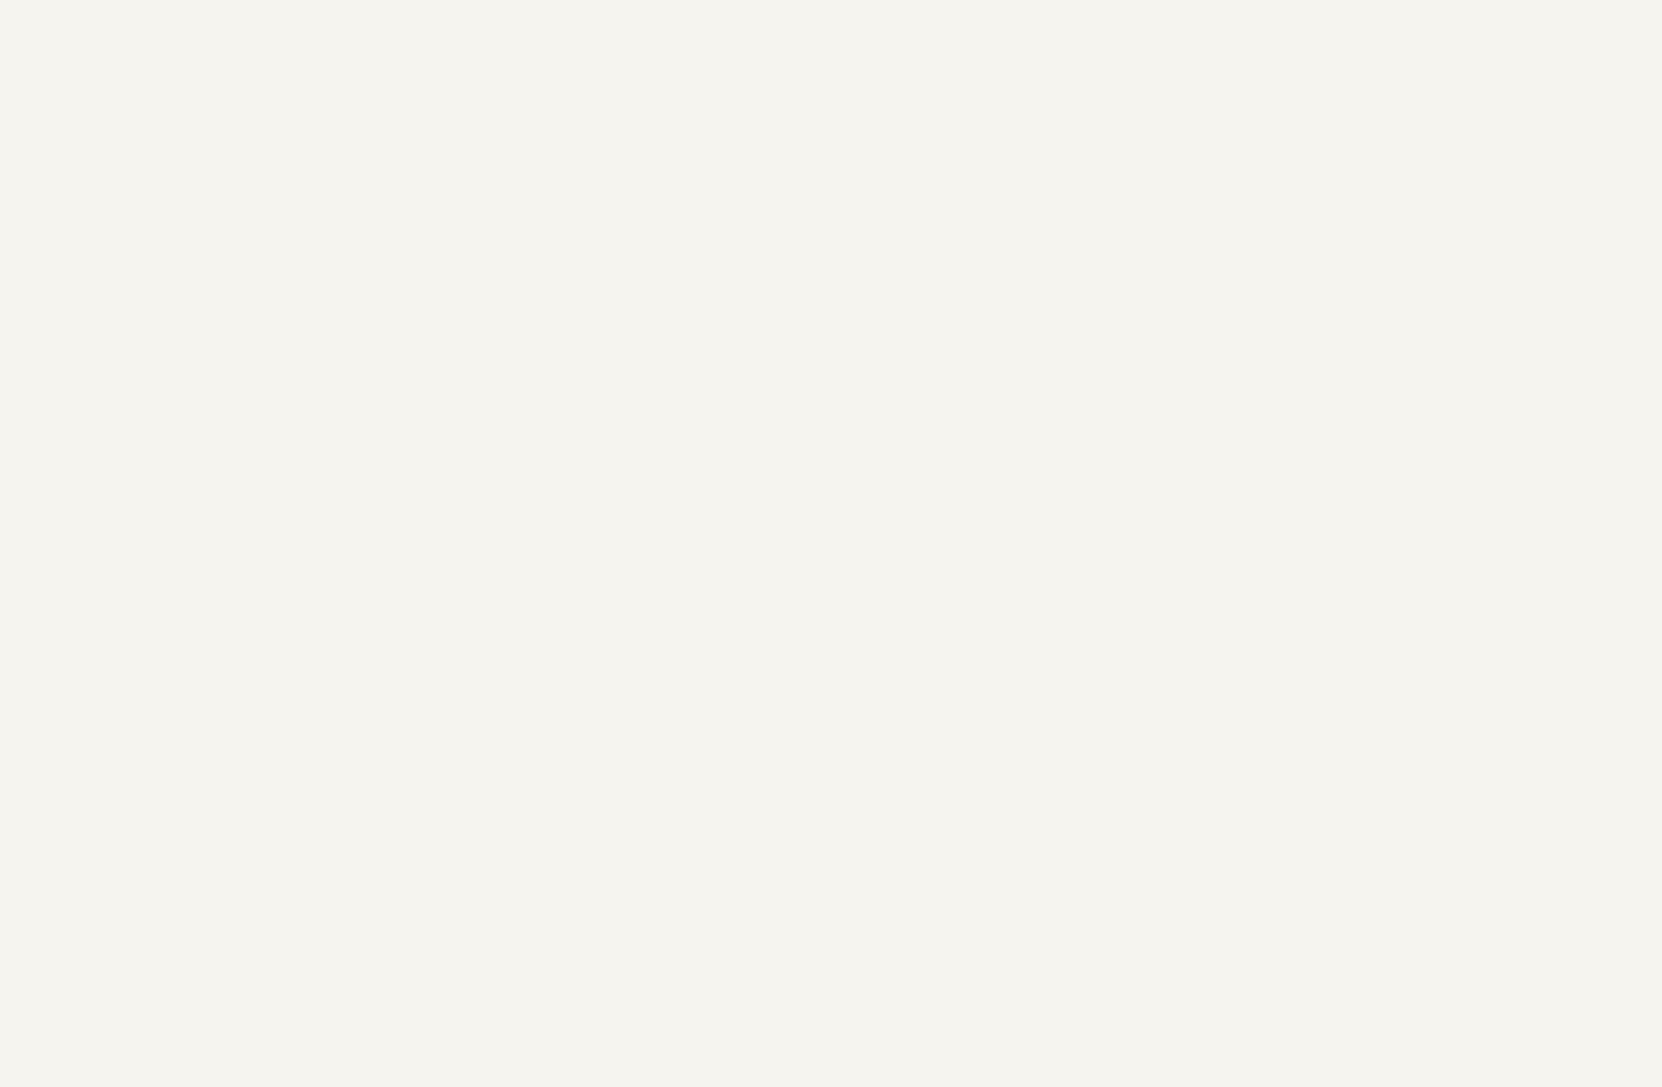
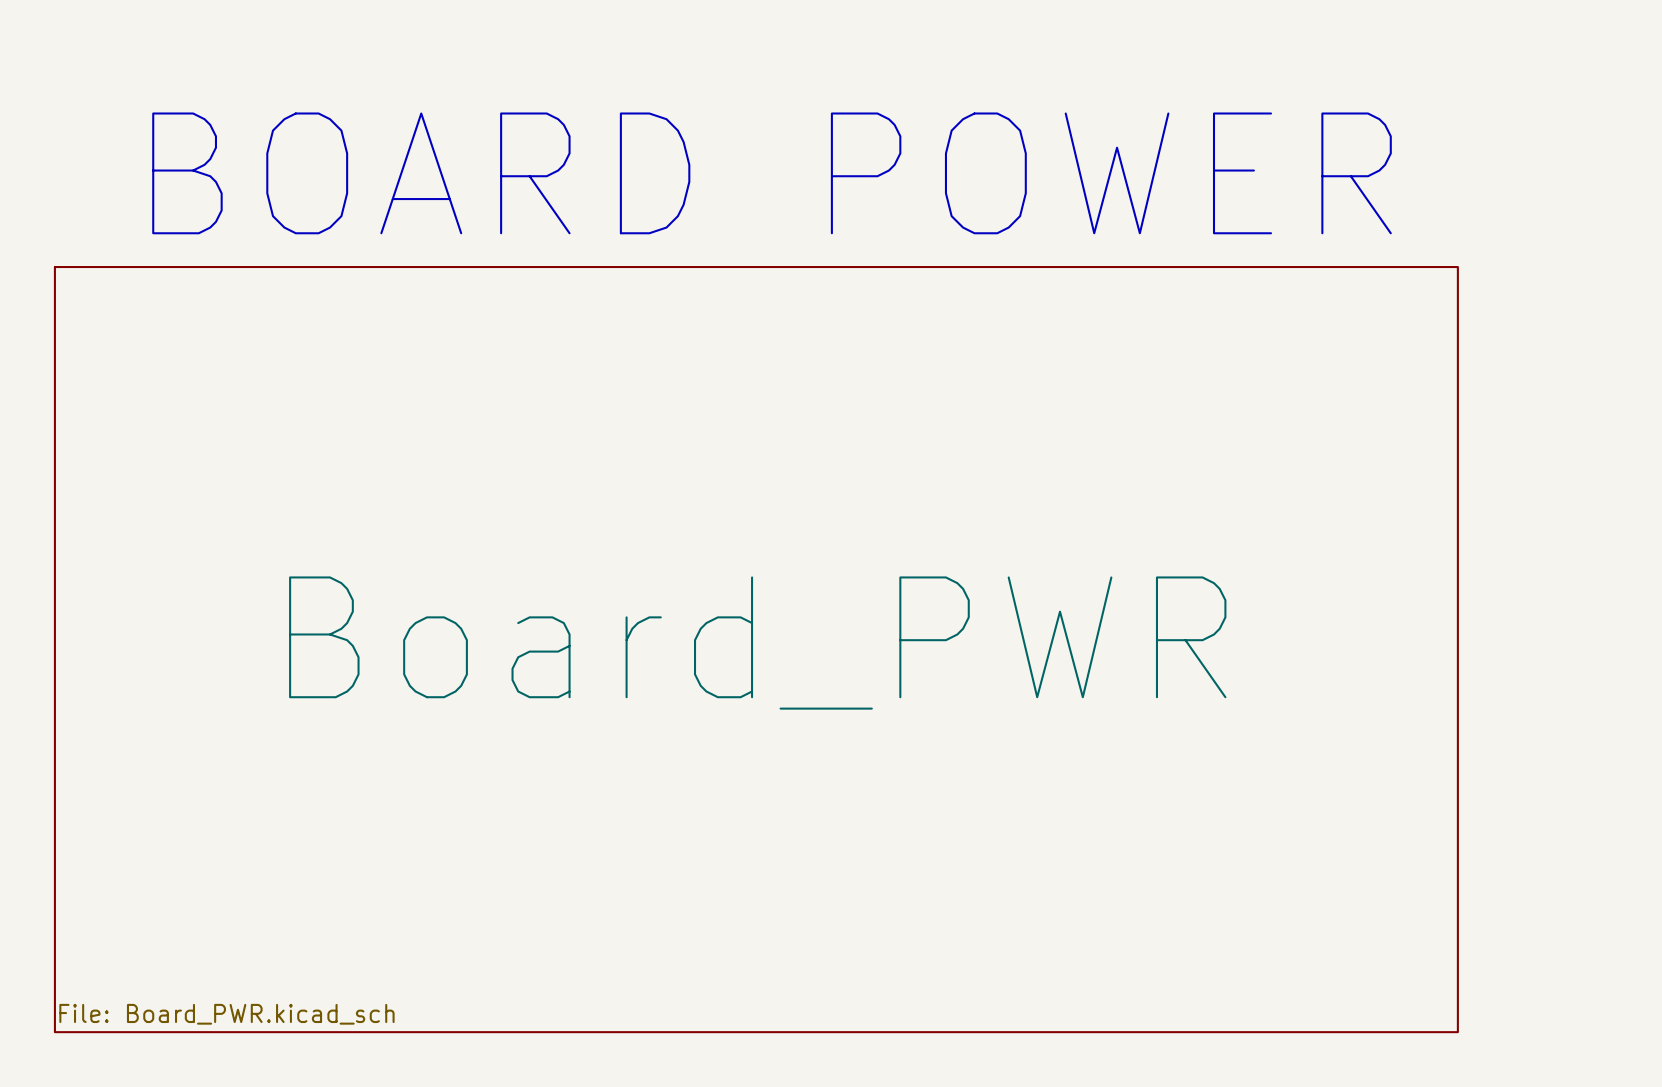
text: none -> BOARD POWER (772, 173)
sheet Board_PWR: none -> File: Board_PWR.kicad_sch (756, 649)

